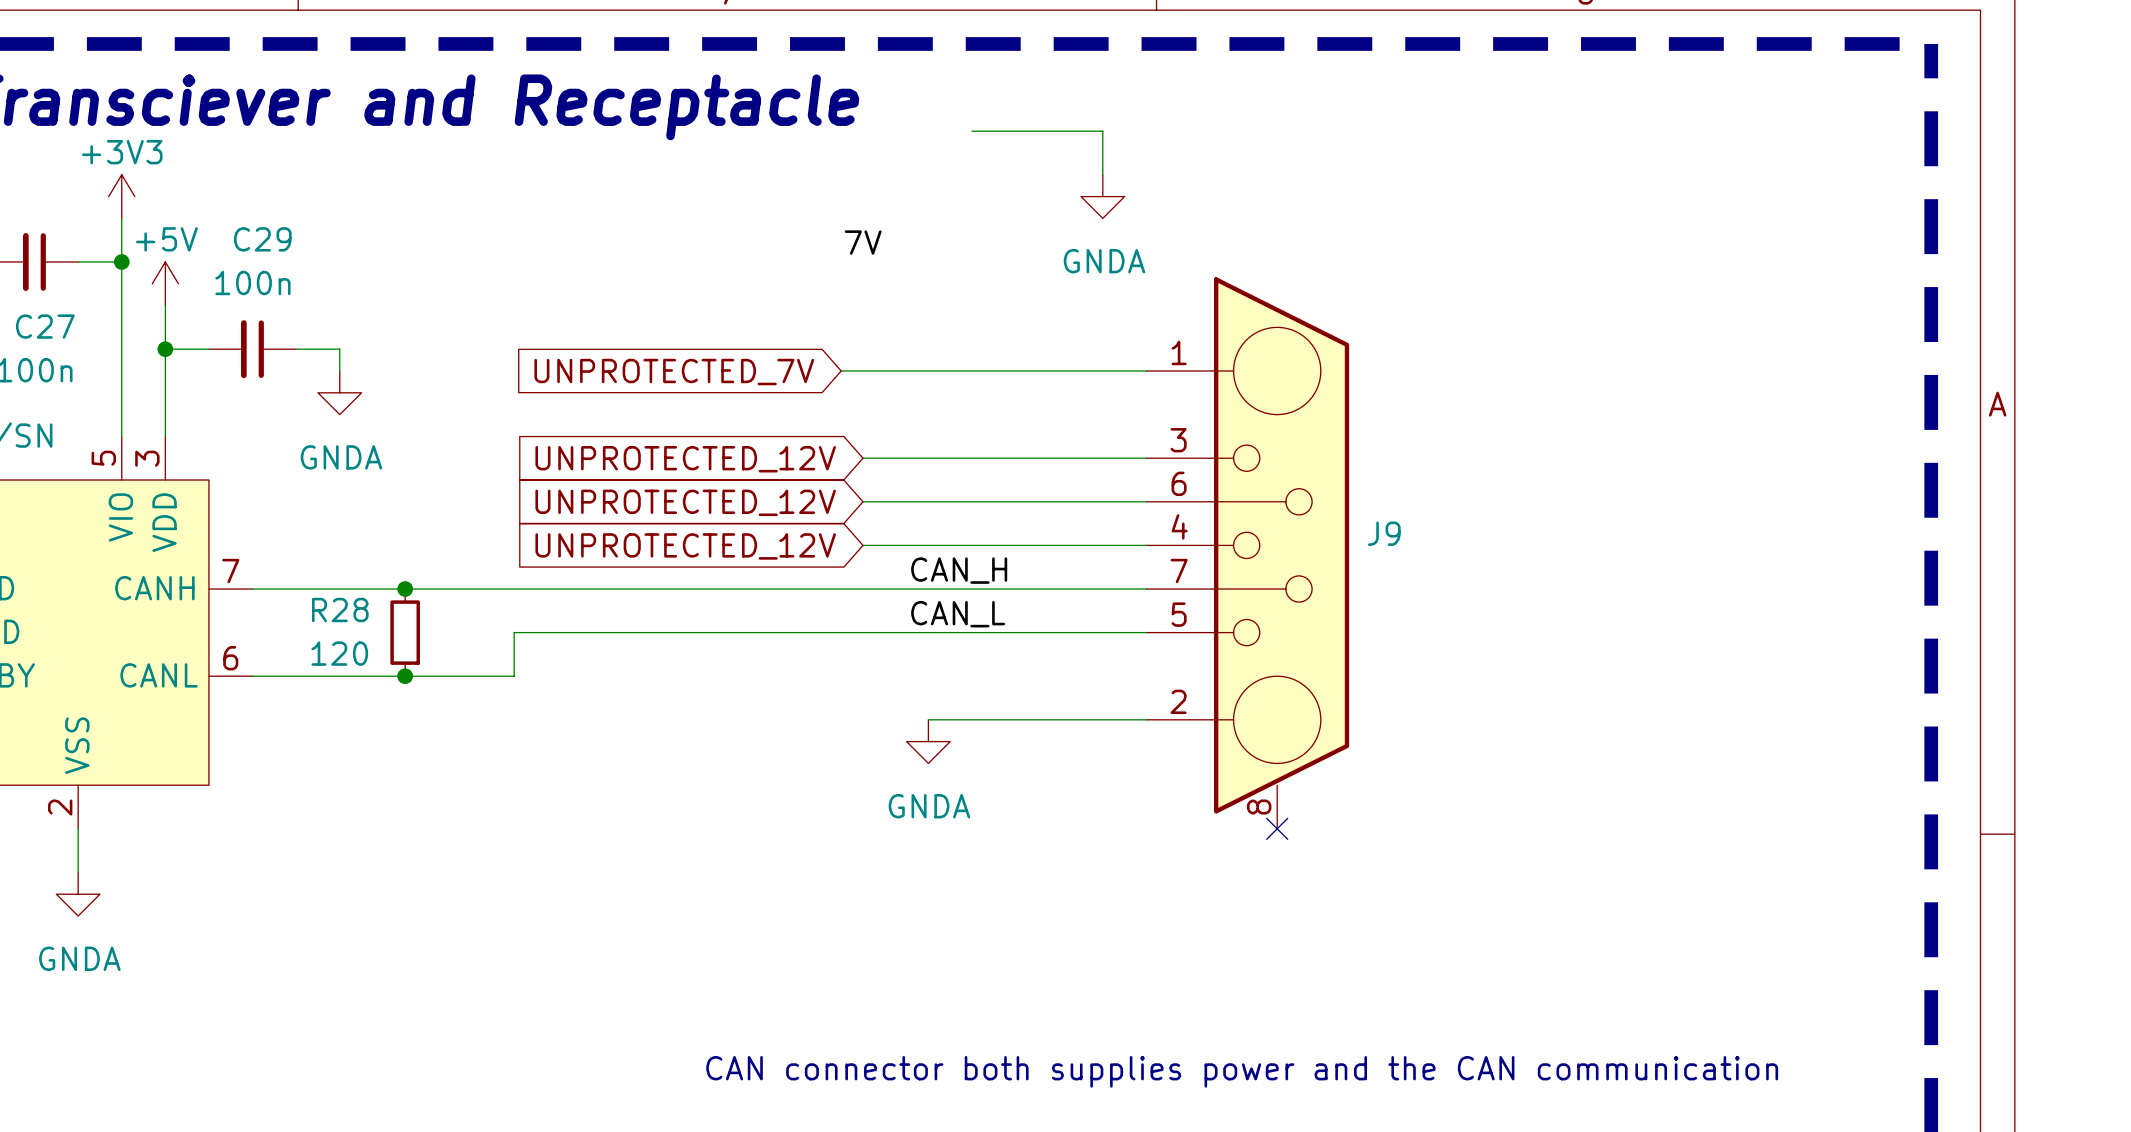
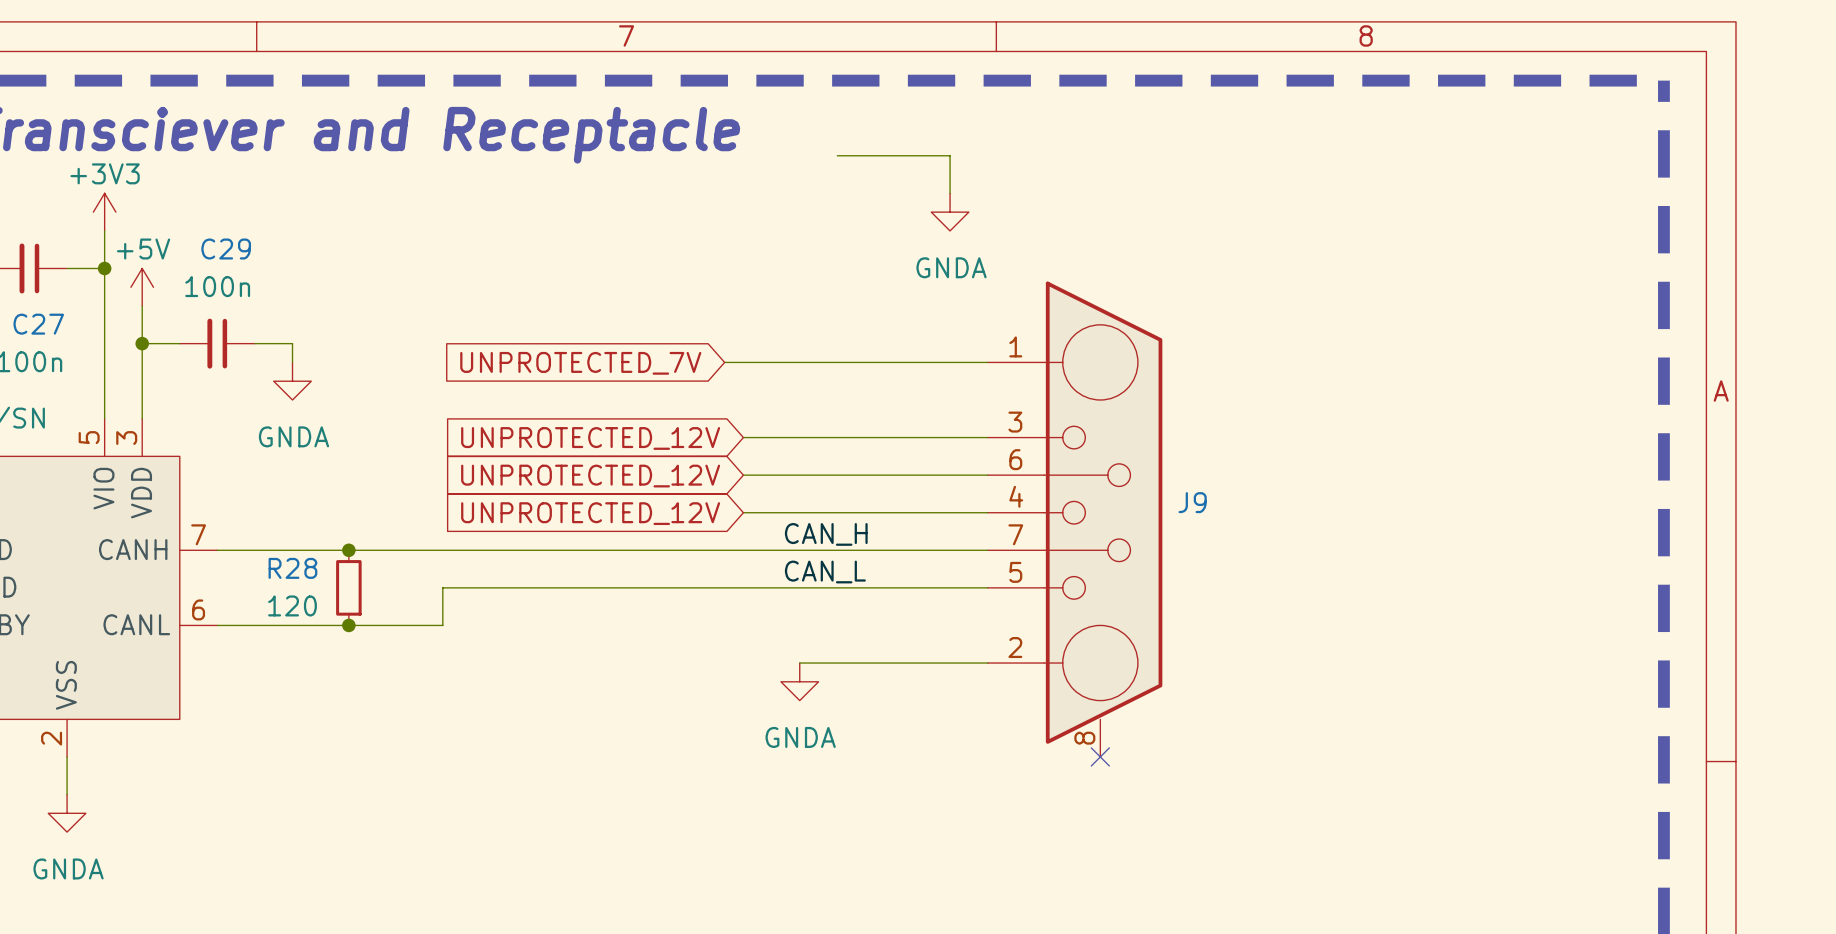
label: 7V (863, 242) -> none

